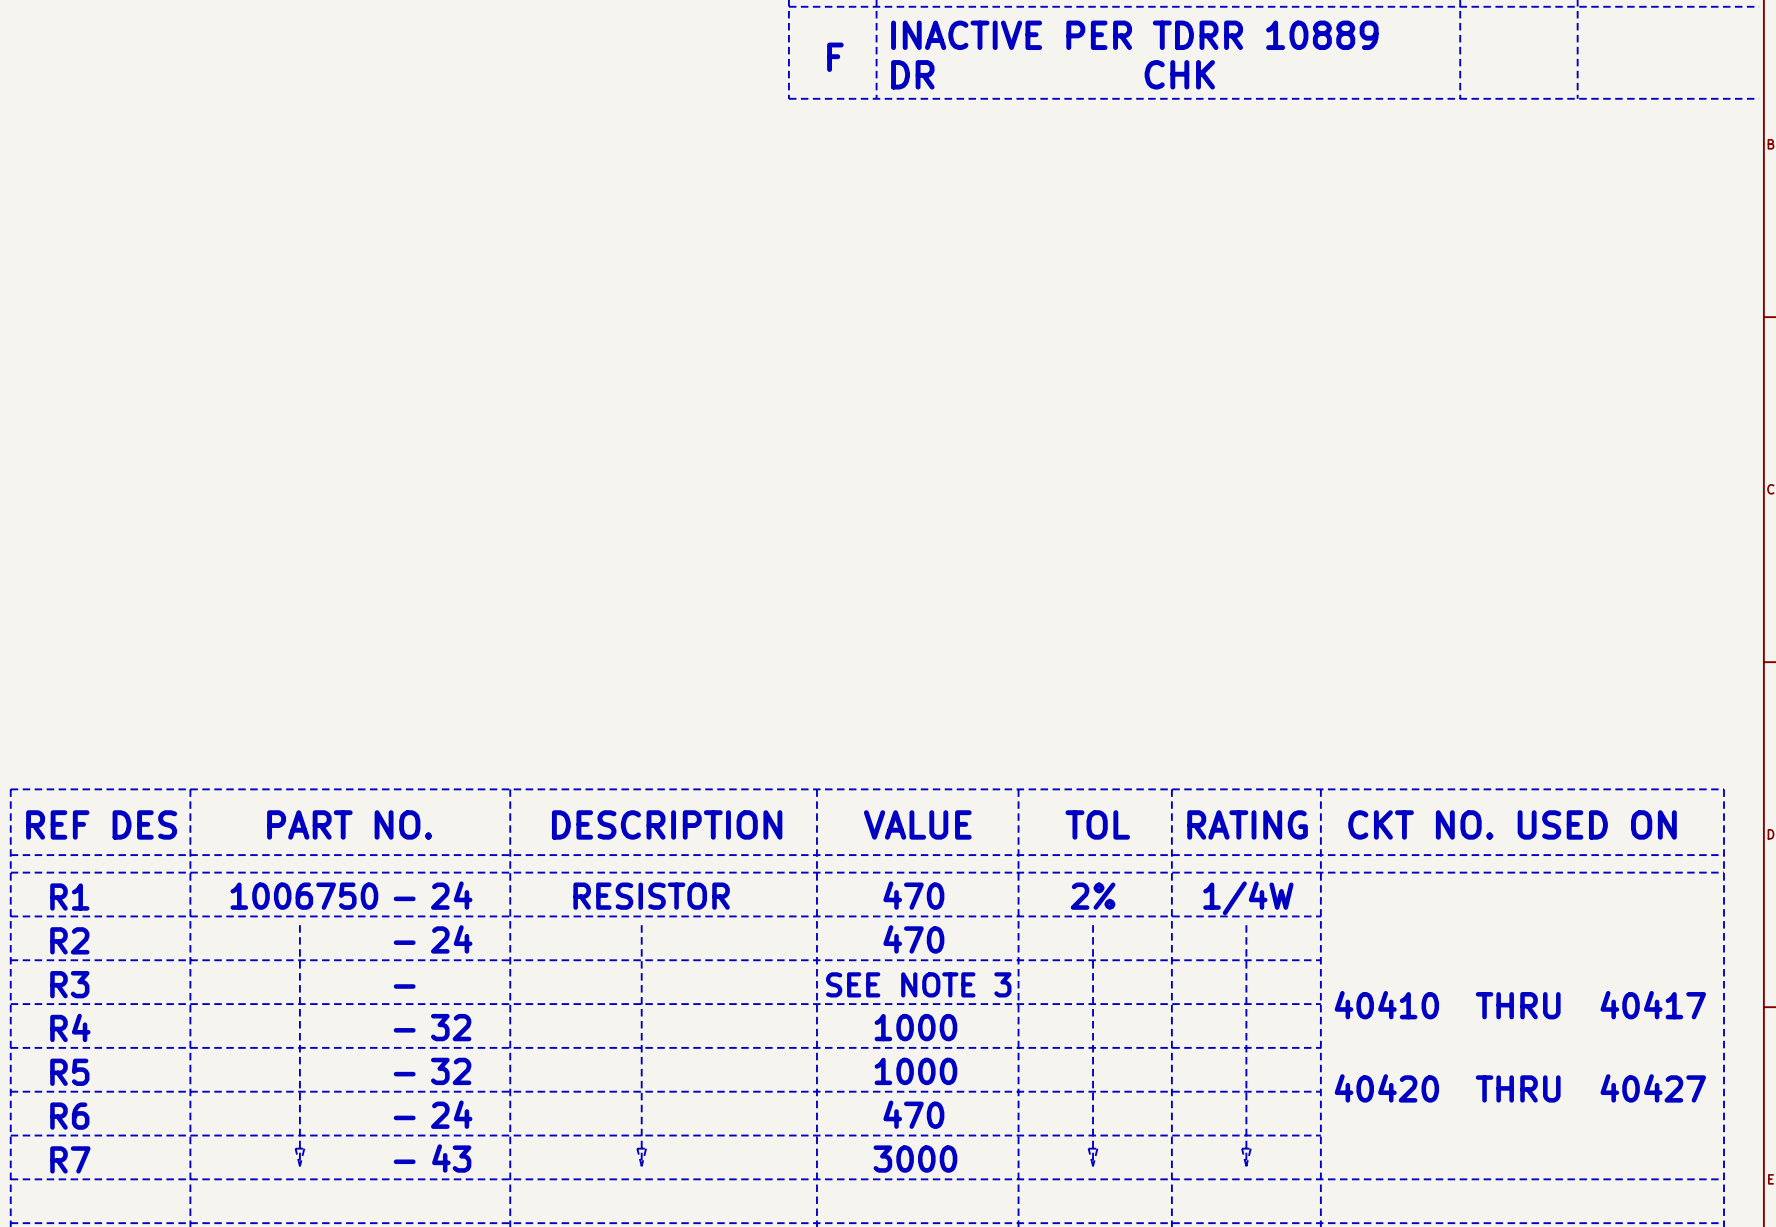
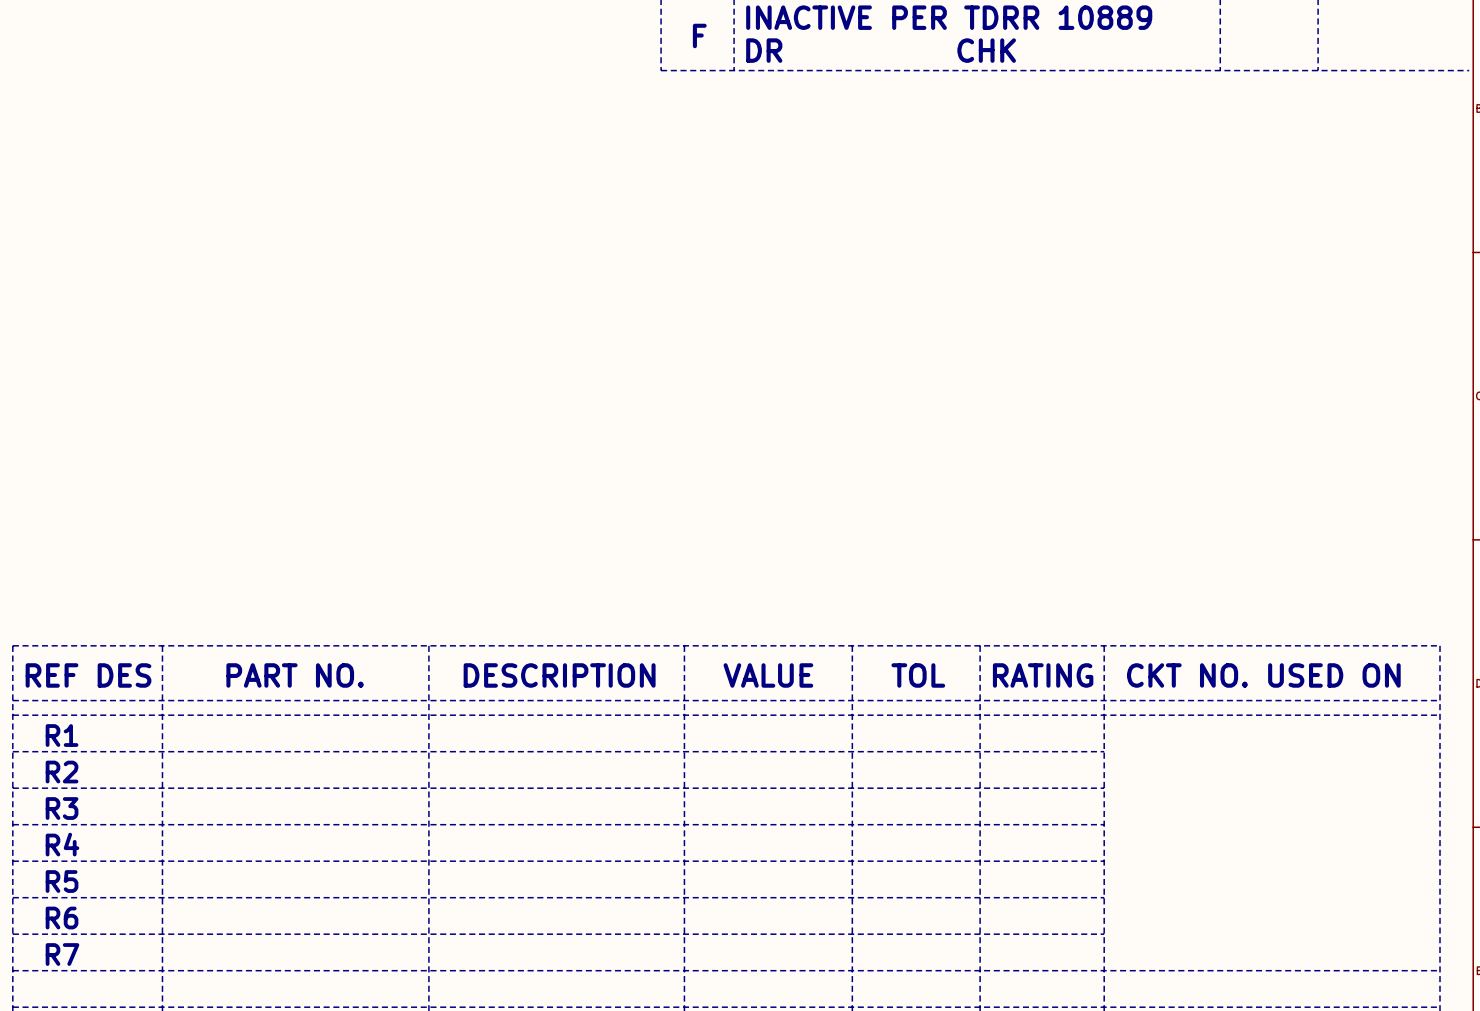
text: 24 (451, 895) -> none
text: 470 (913, 895) -> none
text: 1006750 (304, 896) -> none
text: RESISTOR (651, 896) -> none
text: 2% (1093, 896) -> none
text: - (404, 898) -> none
text: 1/4W (1248, 898) -> none
line: (299, 925) (299, 1166) -> none
line: (641, 925) (641, 1166) -> none
line: (1093, 925) (1093, 1166) -> none
line: (1246, 925) (1246, 1166) -> none
text: 24 (451, 939) -> none
text: 470 (913, 939) -> none
text: - (404, 942) -> none
text: SEE NOTE 3 (918, 984) -> none
text: - (404, 986) -> none
text: 40410 THRU 40417 (1520, 1005) -> none
text: 32 (451, 1027) -> none
text: 1000 (915, 1027) -> none
text: - (404, 1030) -> none
text: 32 (451, 1071) -> none
text: 1000 (915, 1071) -> none
text: - (404, 1074) -> none
text: 40420 THRU 40427 (1520, 1088) -> none
text: 24 (451, 1114) -> none
text: 470 (913, 1114) -> none
text: - (404, 1117) -> none
text: 43 (451, 1158) -> none
text: 3000 (915, 1159) -> none
text: - (404, 1161) -> none
line: (299, 1166) (295, 1148) (304, 1148) (299, 1166) -> none
line: (641, 1166) (637, 1148) (646, 1148) (641, 1166) -> none
line: (1093, 1166) (1088, 1148) (1097, 1148) (1093, 1166) -> none
line: (1246, 1166) (1242, 1148) (1250, 1148) (1246, 1166) -> none

